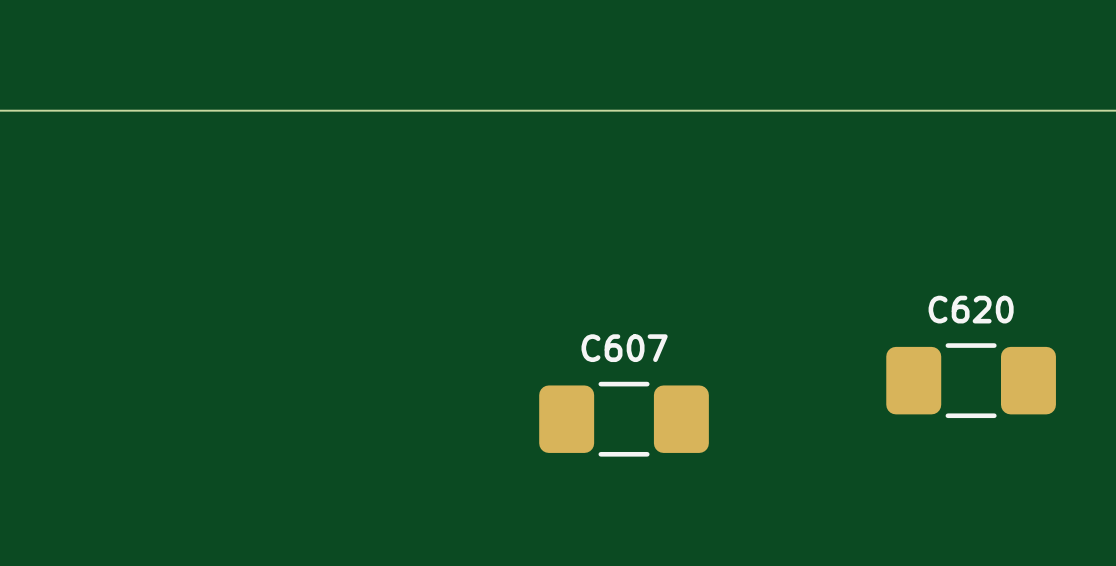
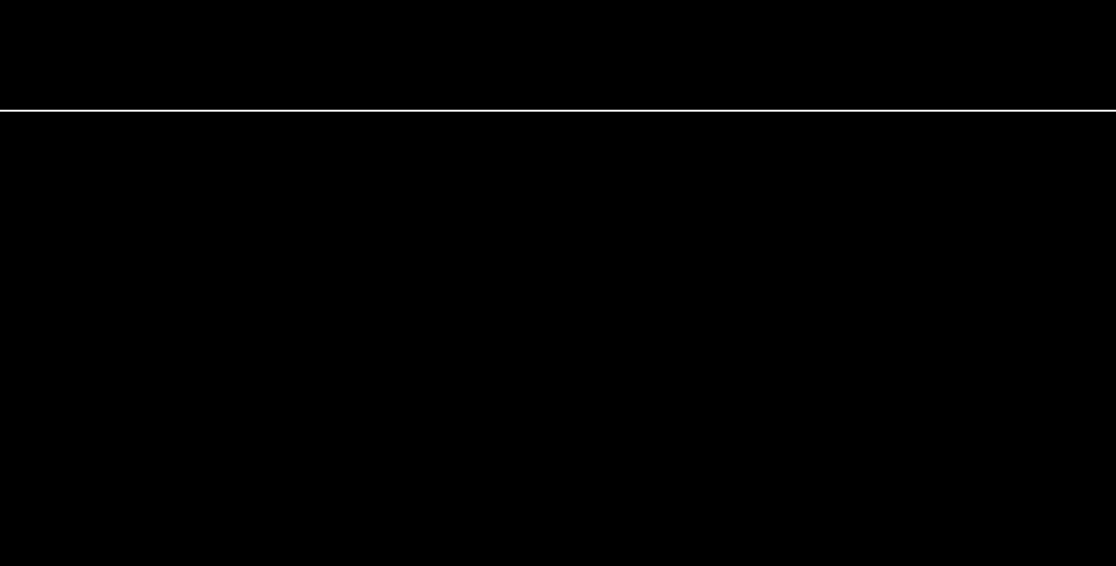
C620: (971, 380) -> none
C607: (624, 419) -> none

